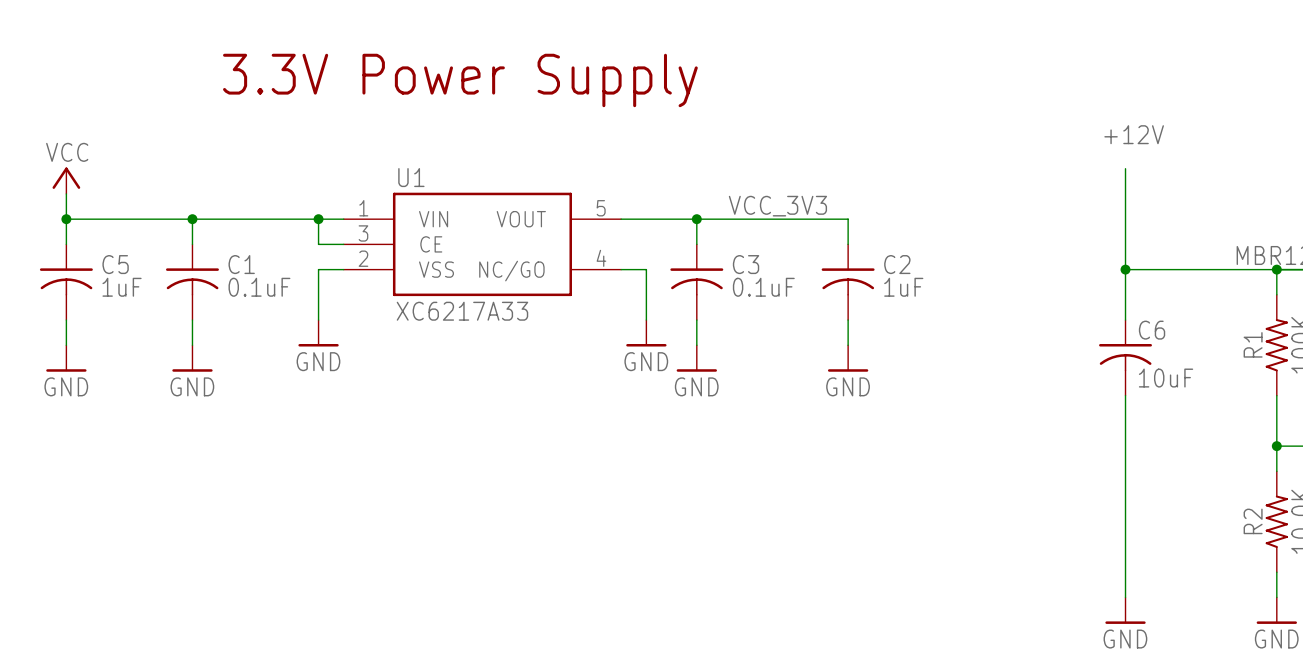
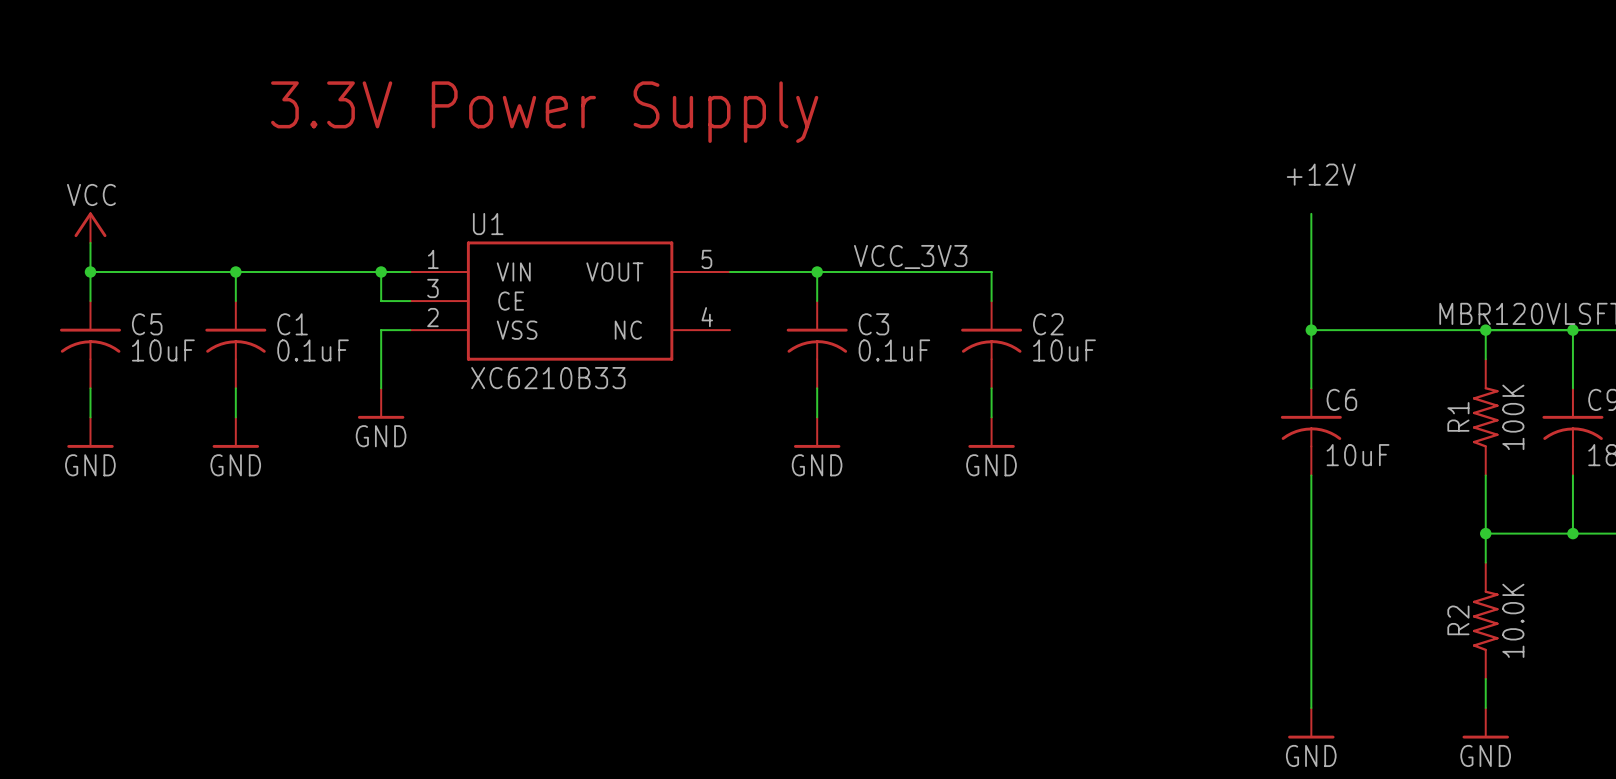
wire: (621, 269) (646, 269) (646, 320) -> none
U1 pin name: NC/GO (511, 271) -> NC (628, 330)
C5 value: 1uF (122, 287) -> 10uF (163, 350)
C2 value: 1uF (903, 287) -> 10uF (1064, 350)
U1 value: XC6217A33 (462, 311) -> XC6210B33 (548, 378)
power symbol: GND (646, 333) -> none

